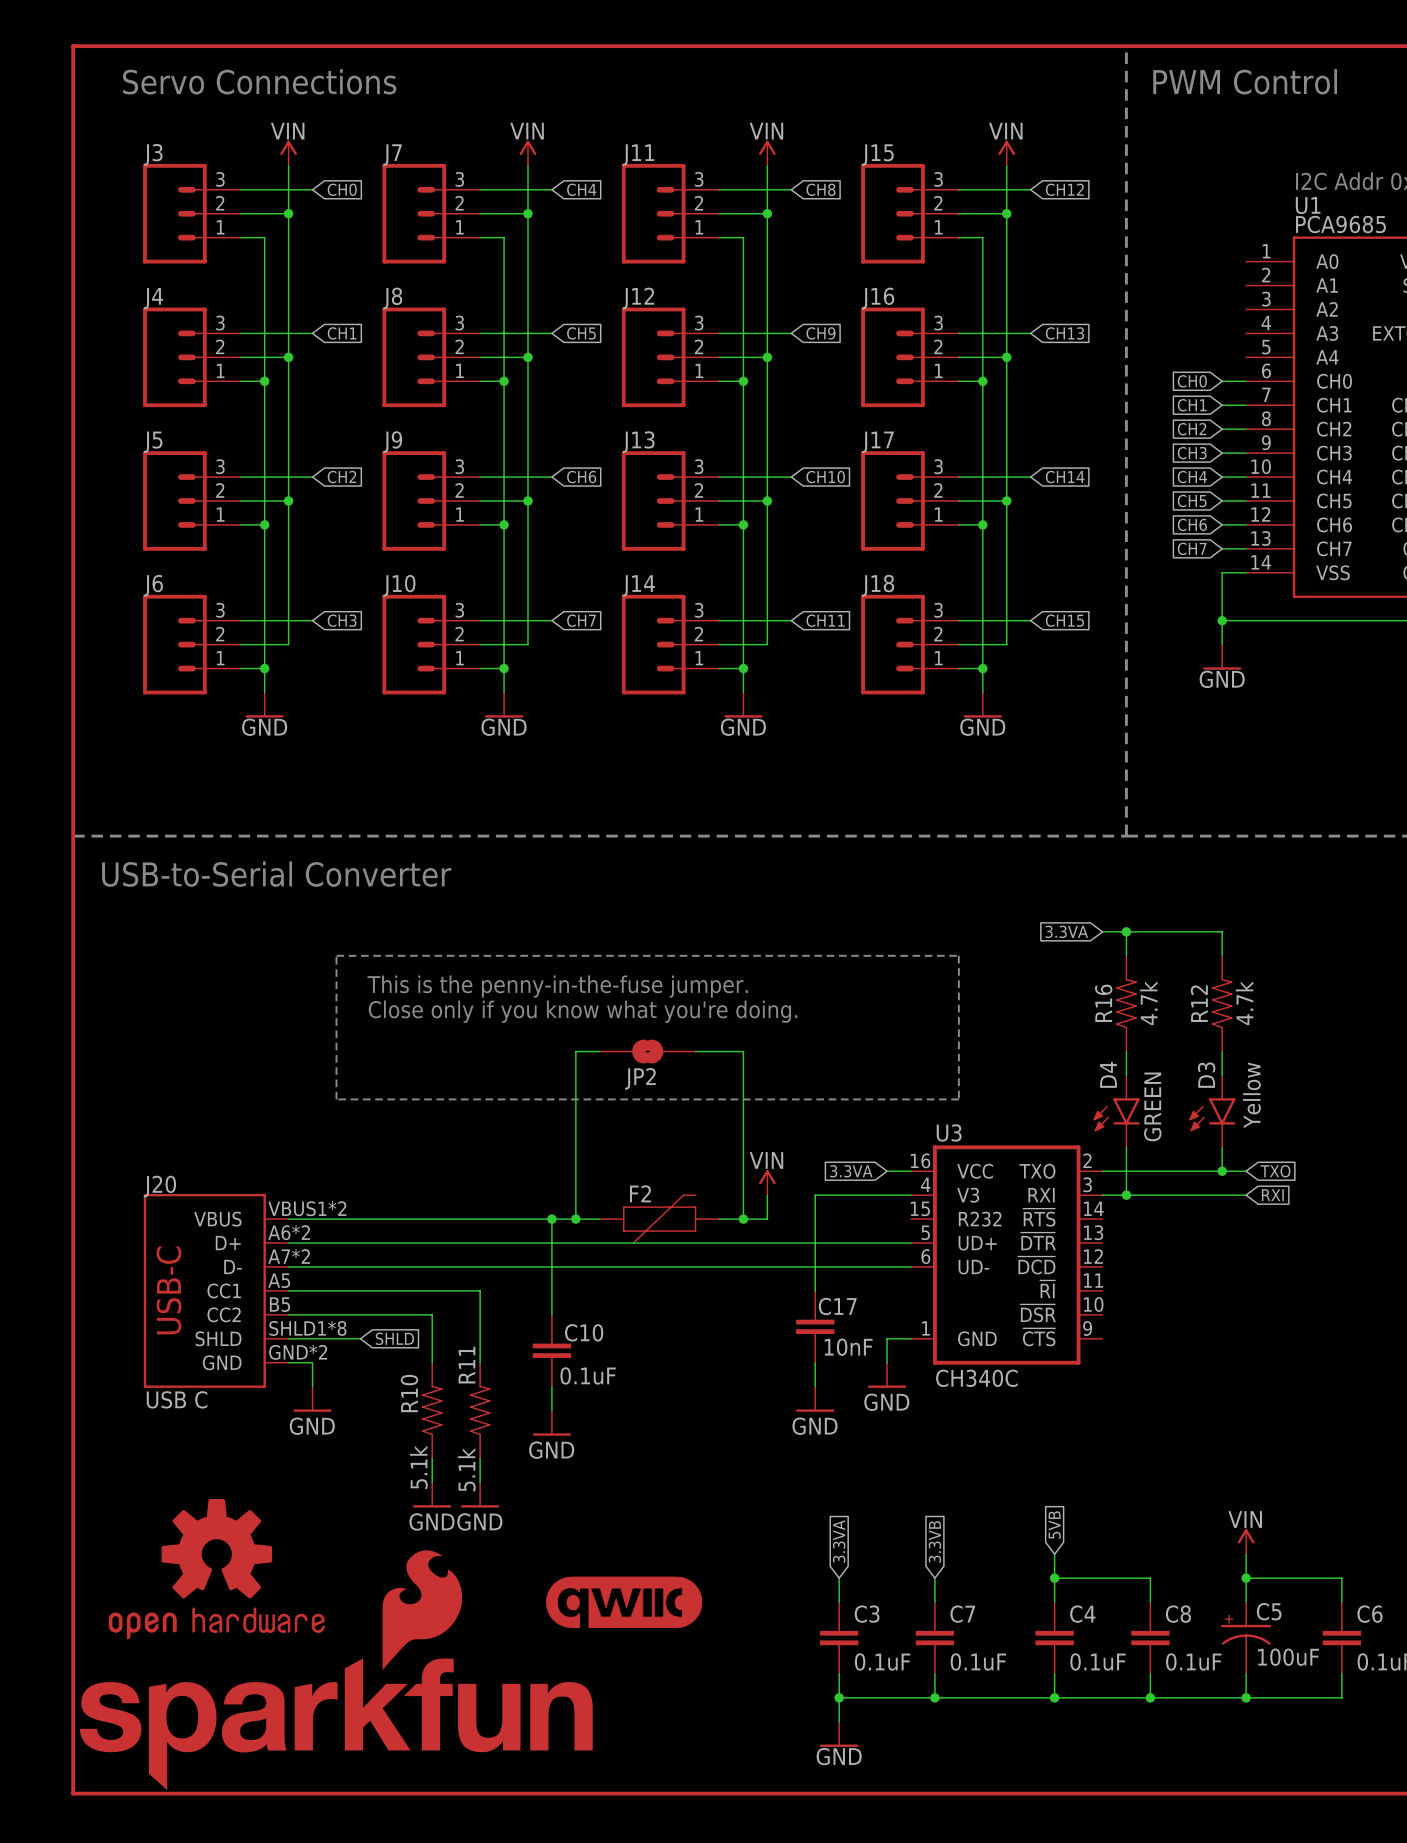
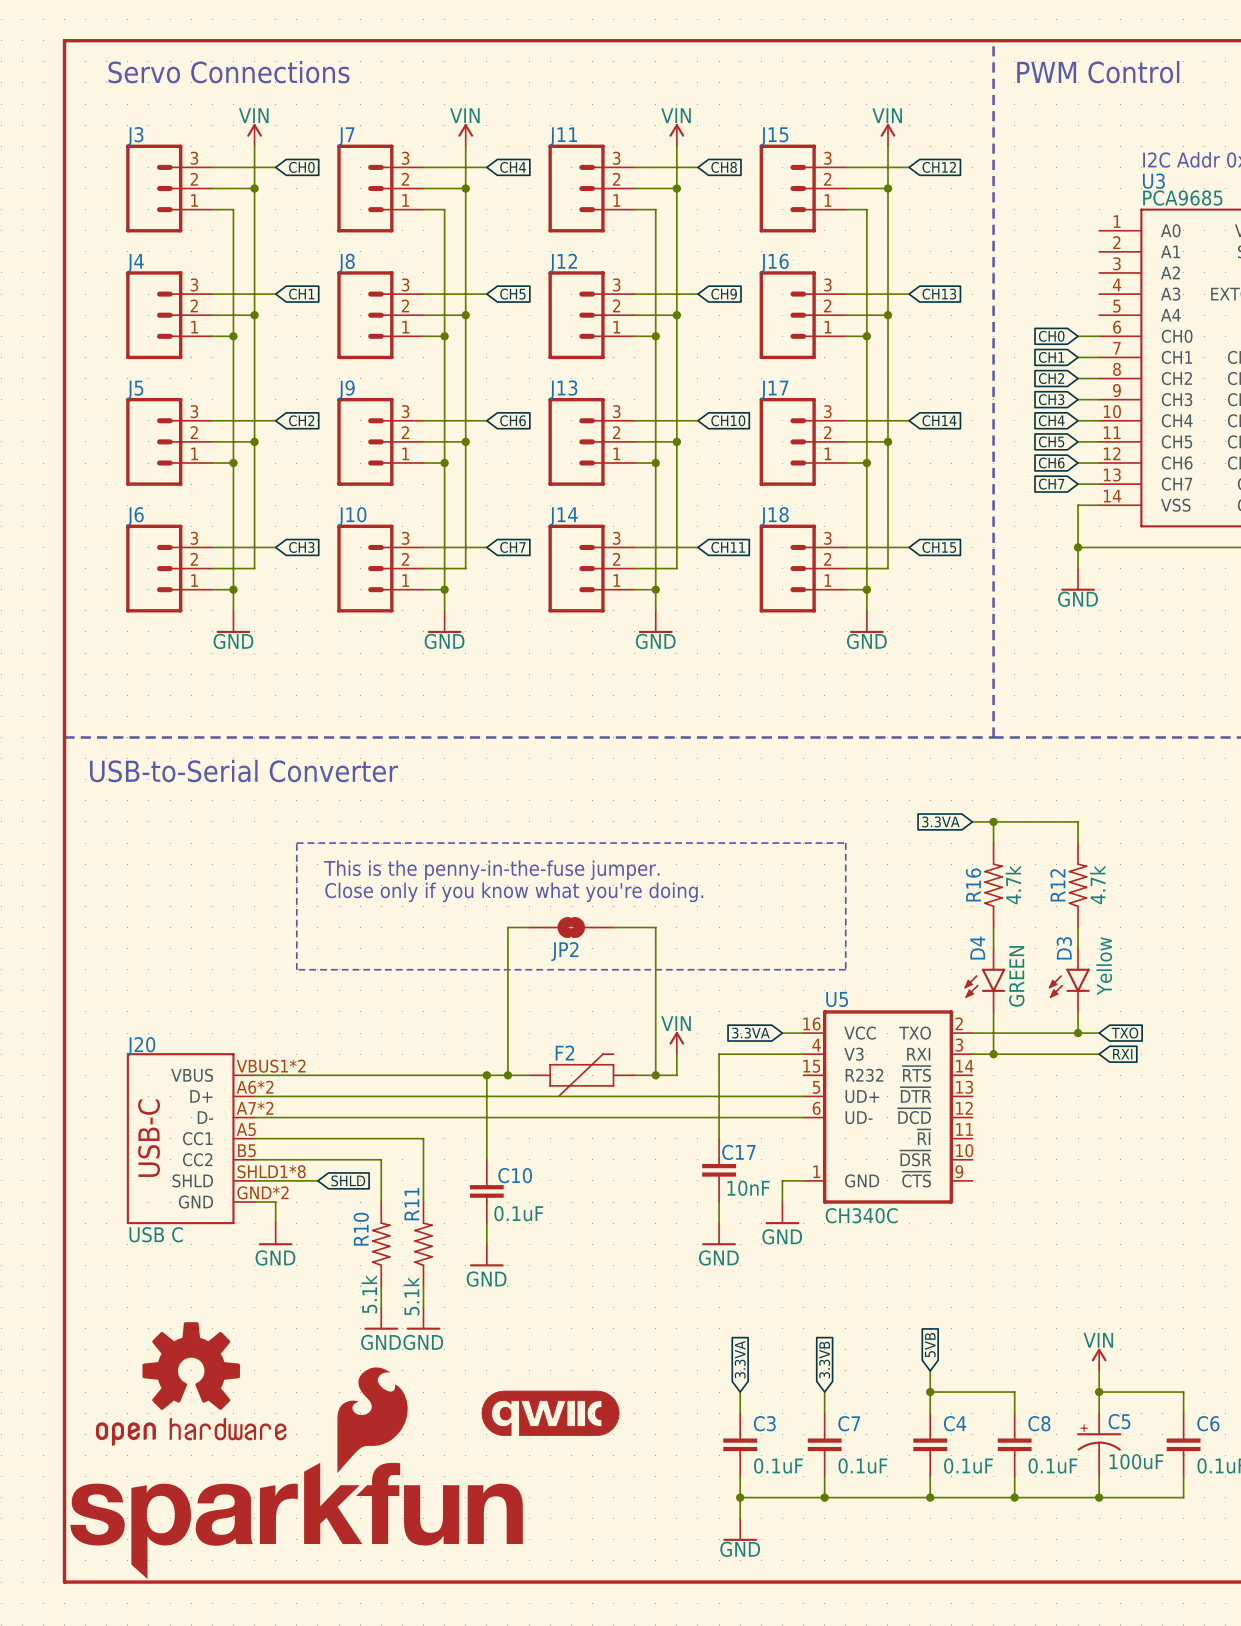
U1 name: U1 (1308, 205) -> U3 (1153, 181)
U3 name: U3 (949, 1132) -> U5 (837, 999)

